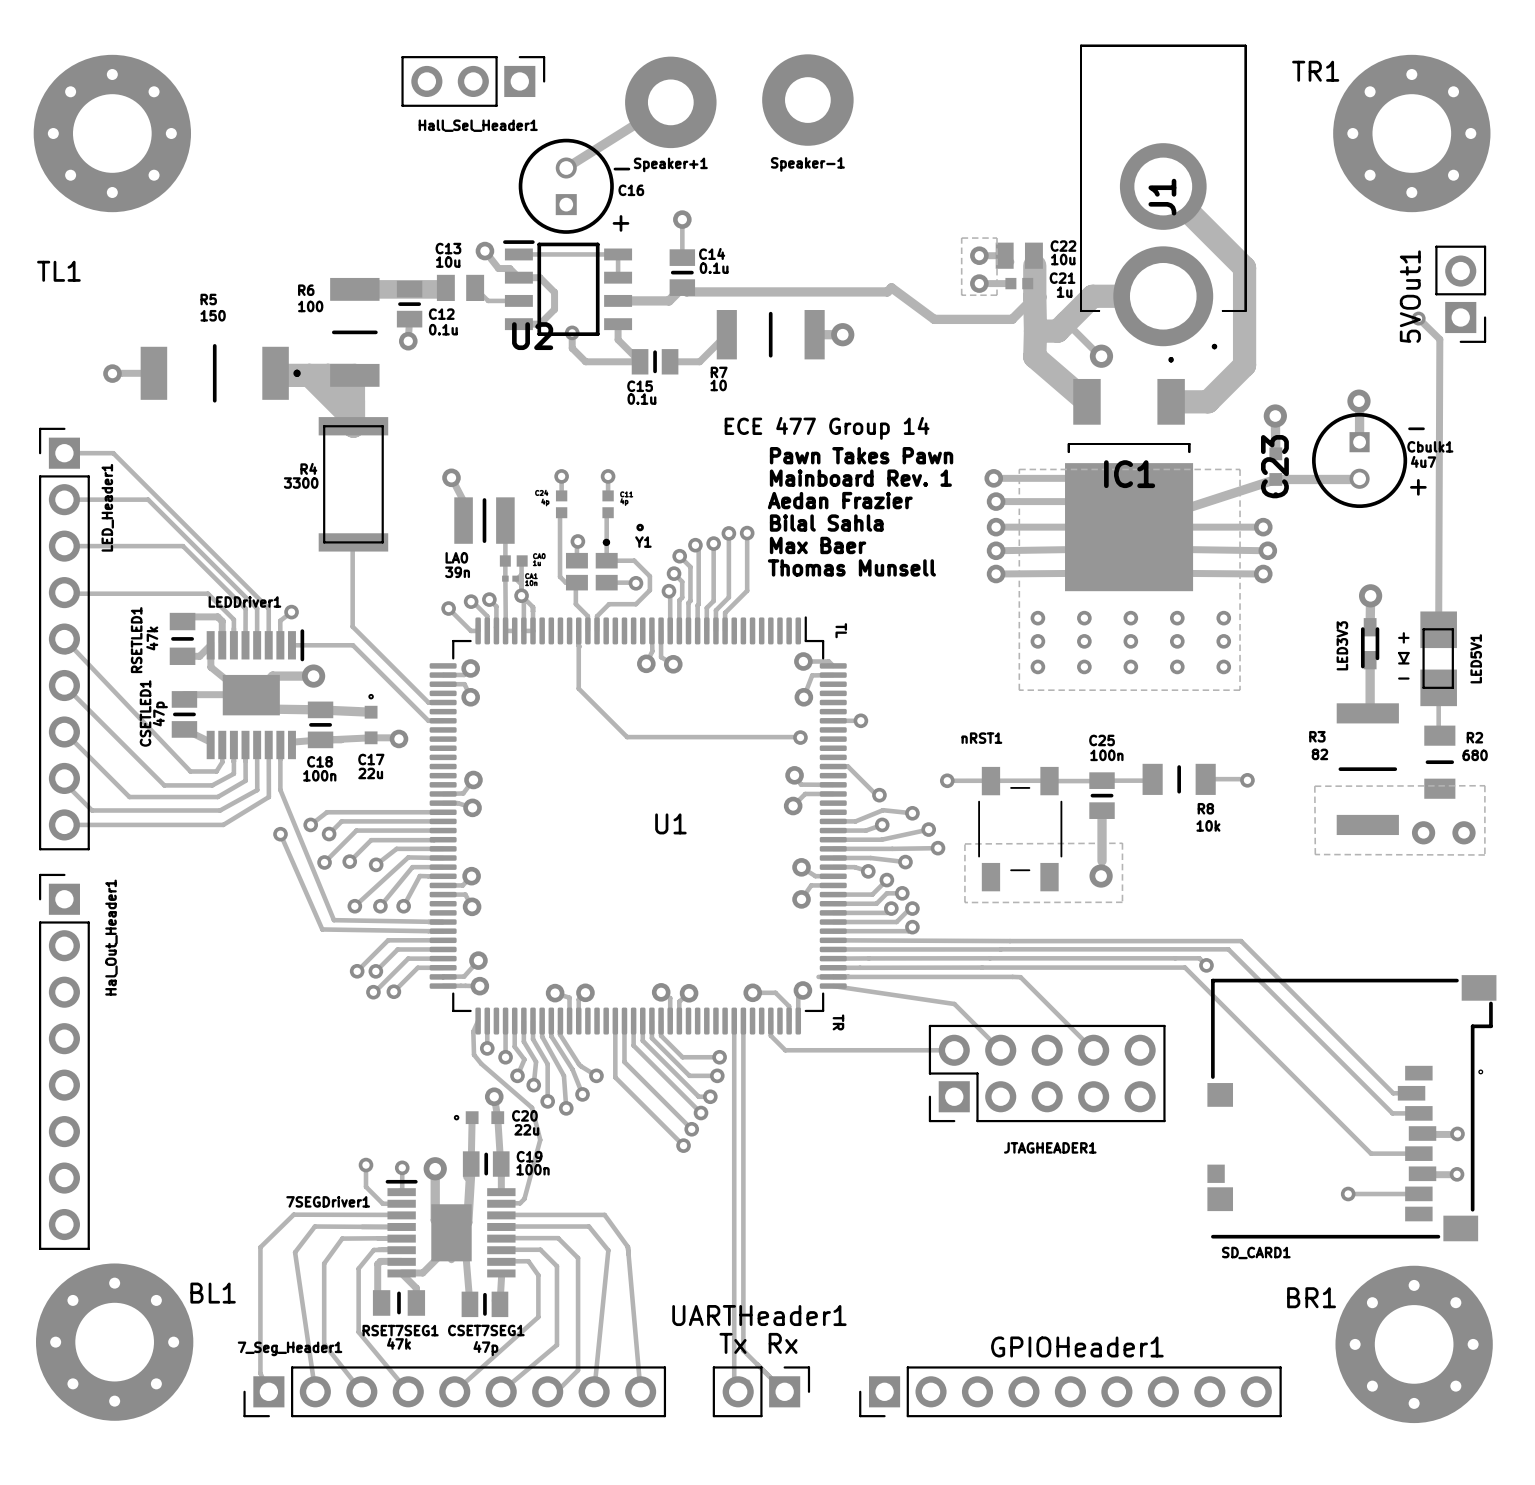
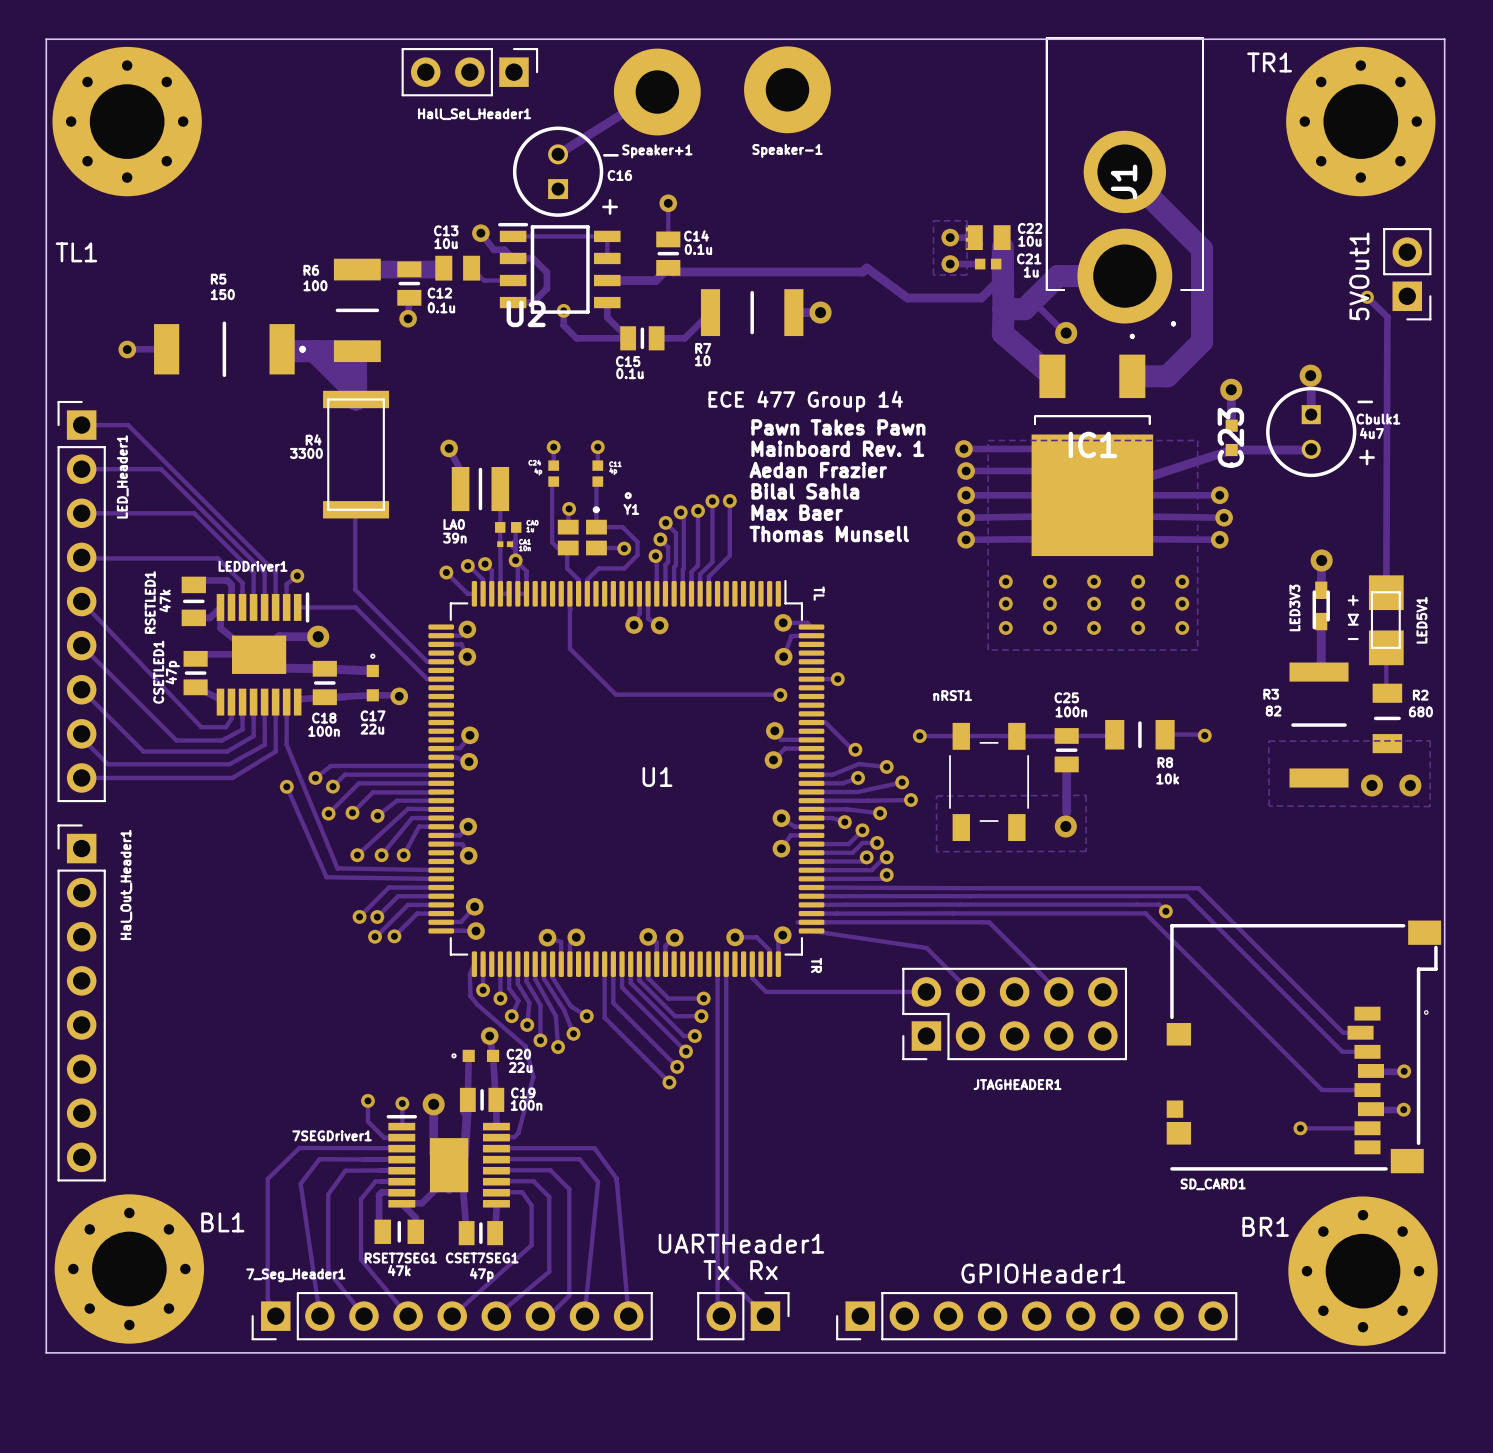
board edge: none -> (46, 39) (46, 1352) (1444, 1352) (1444, 39) (46, 39)

